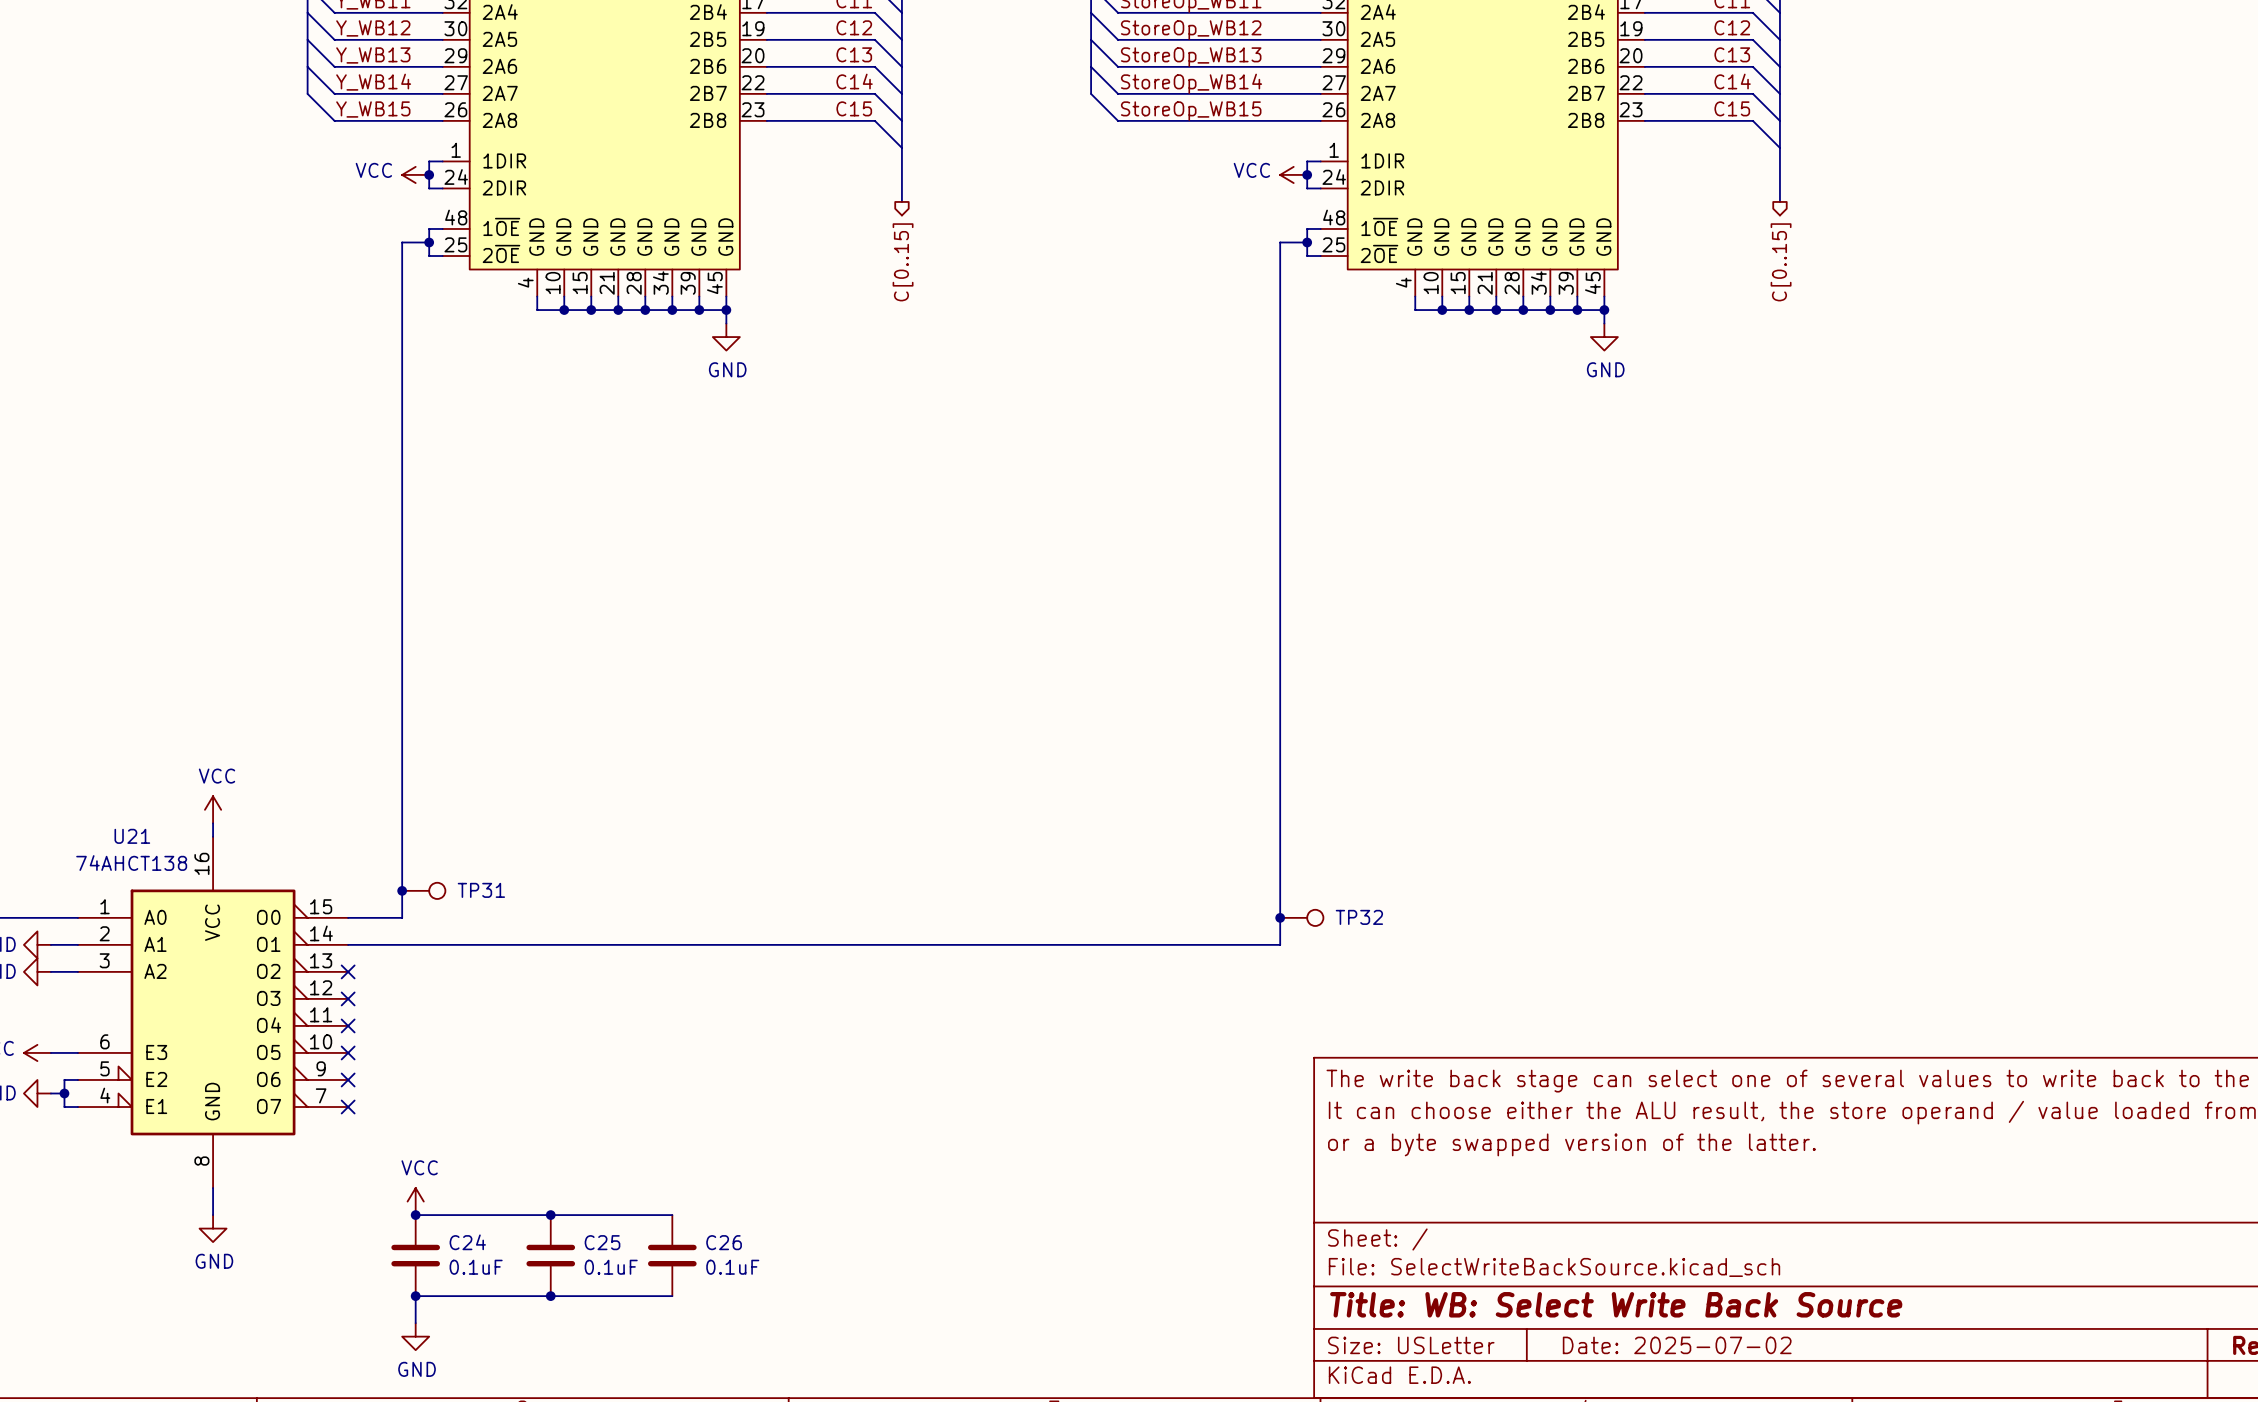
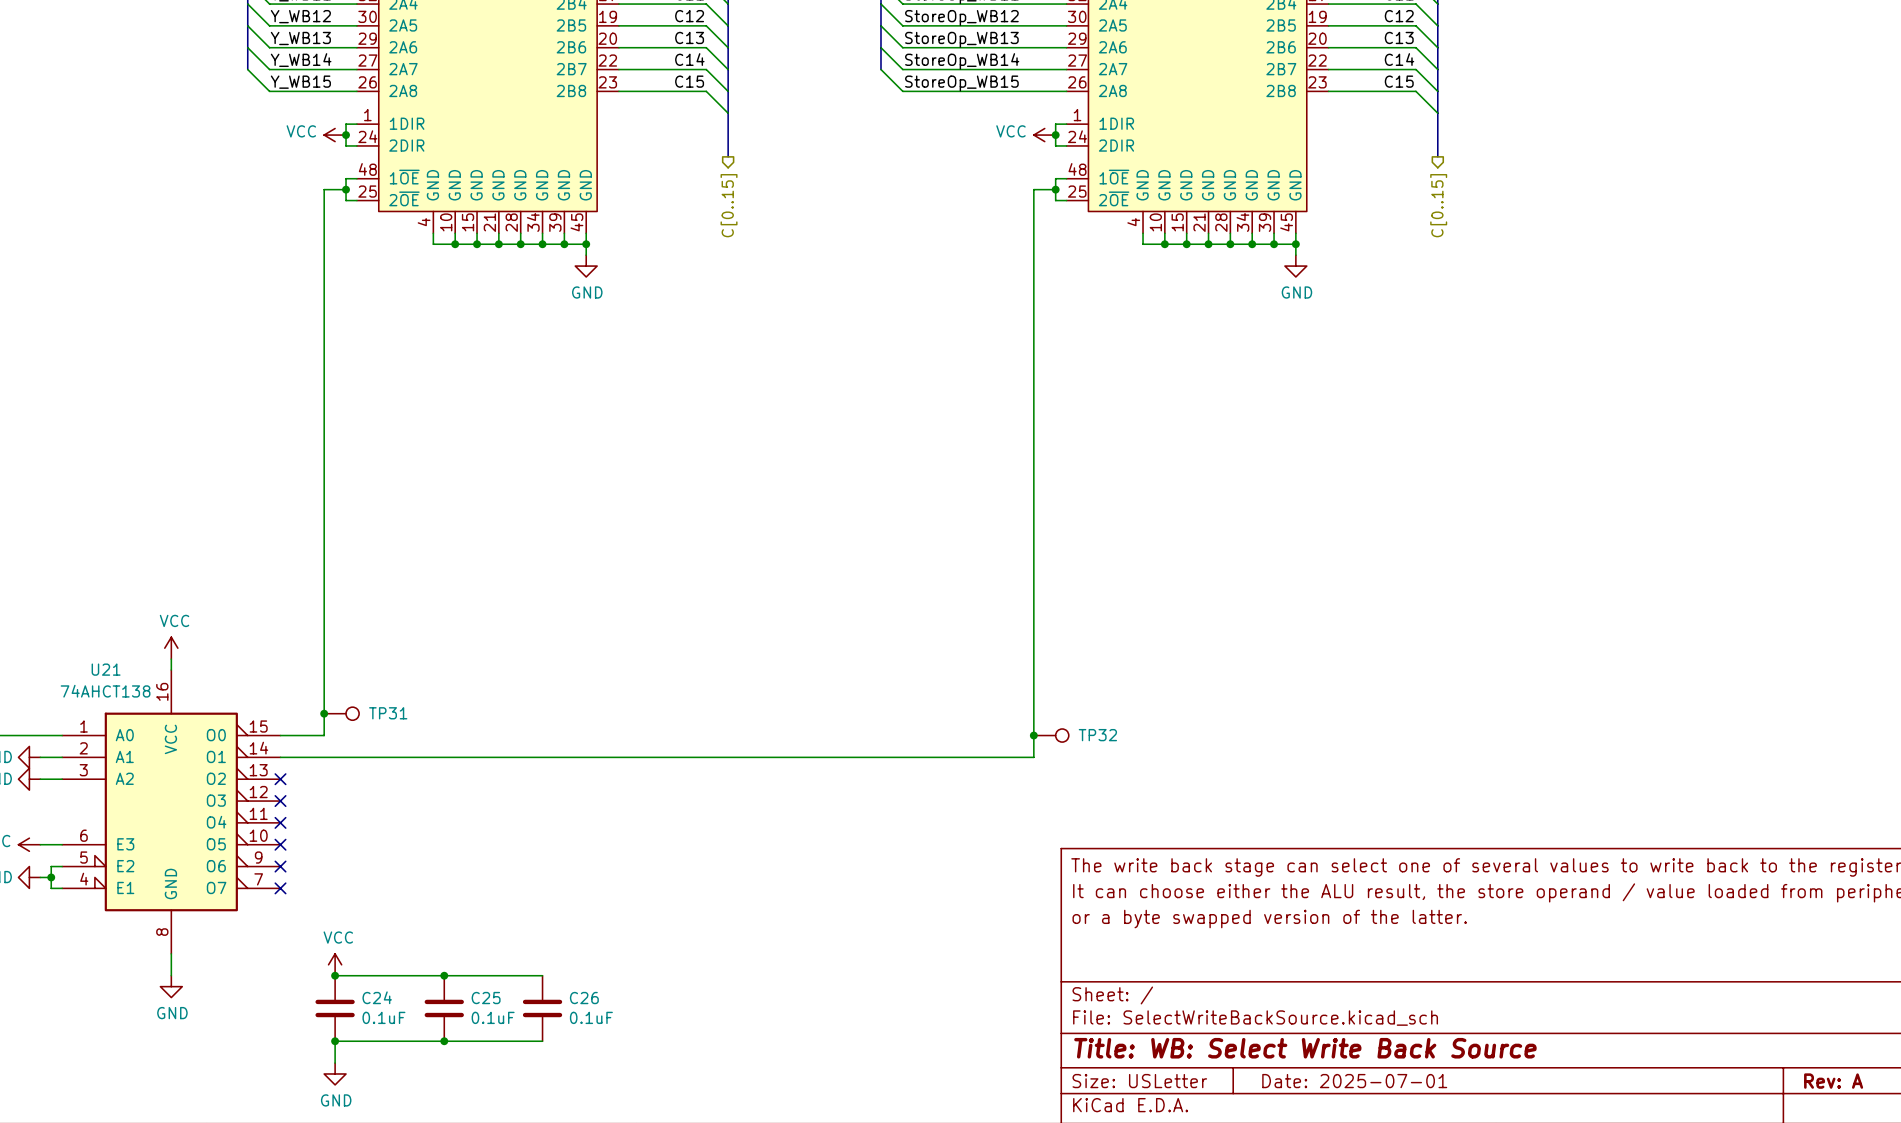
title block: Date: 2025-07-02 (1677, 1345) -> Date: 2025-07-01 (1354, 1081)

